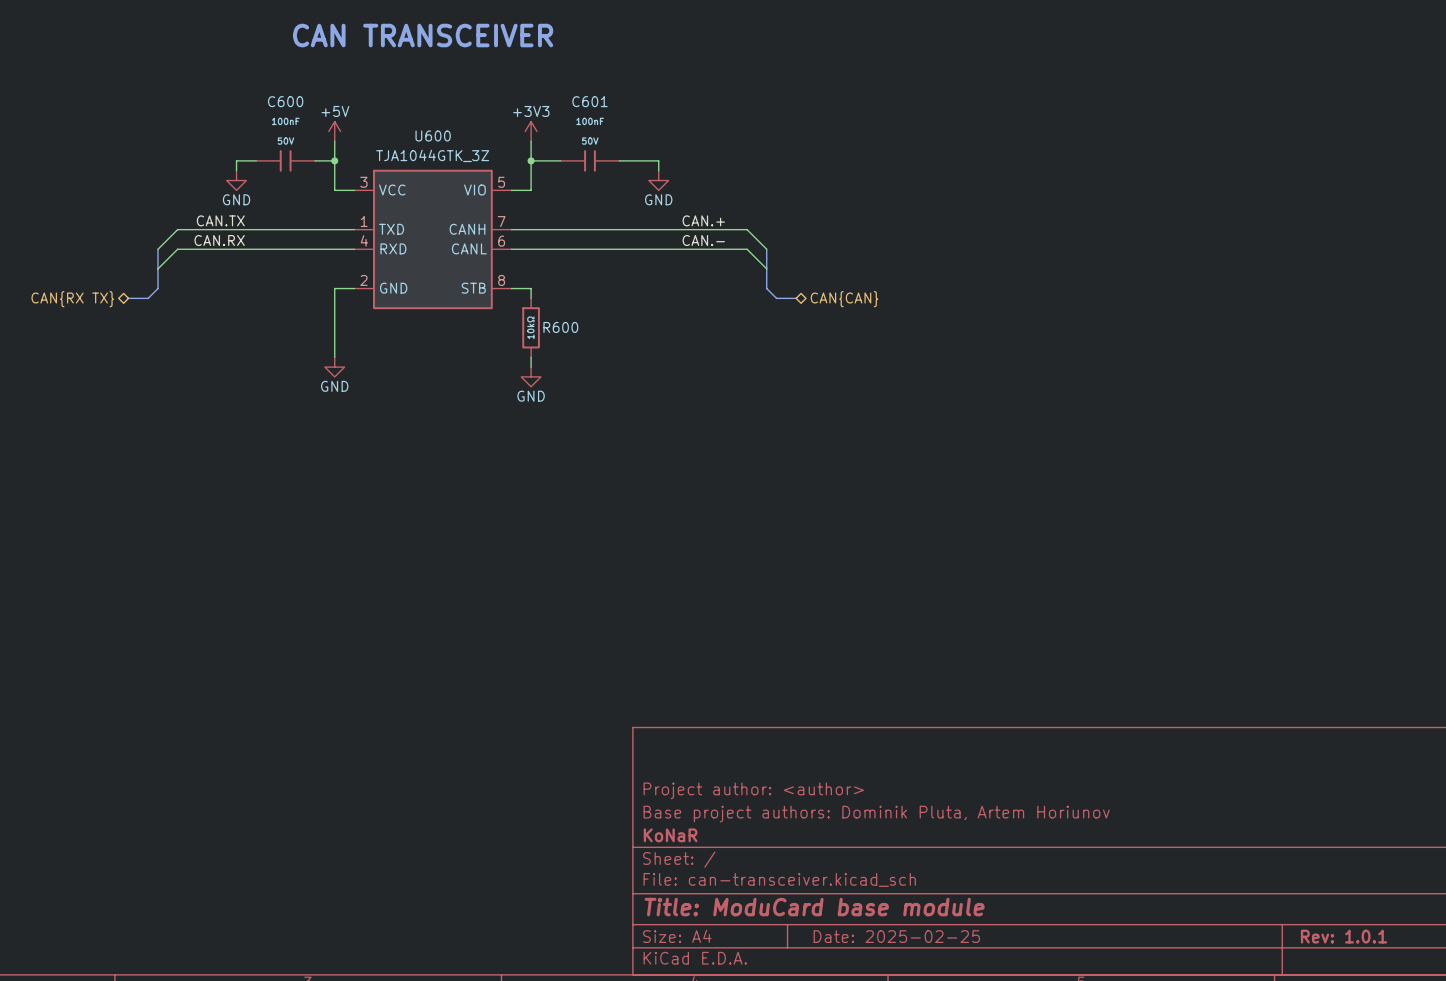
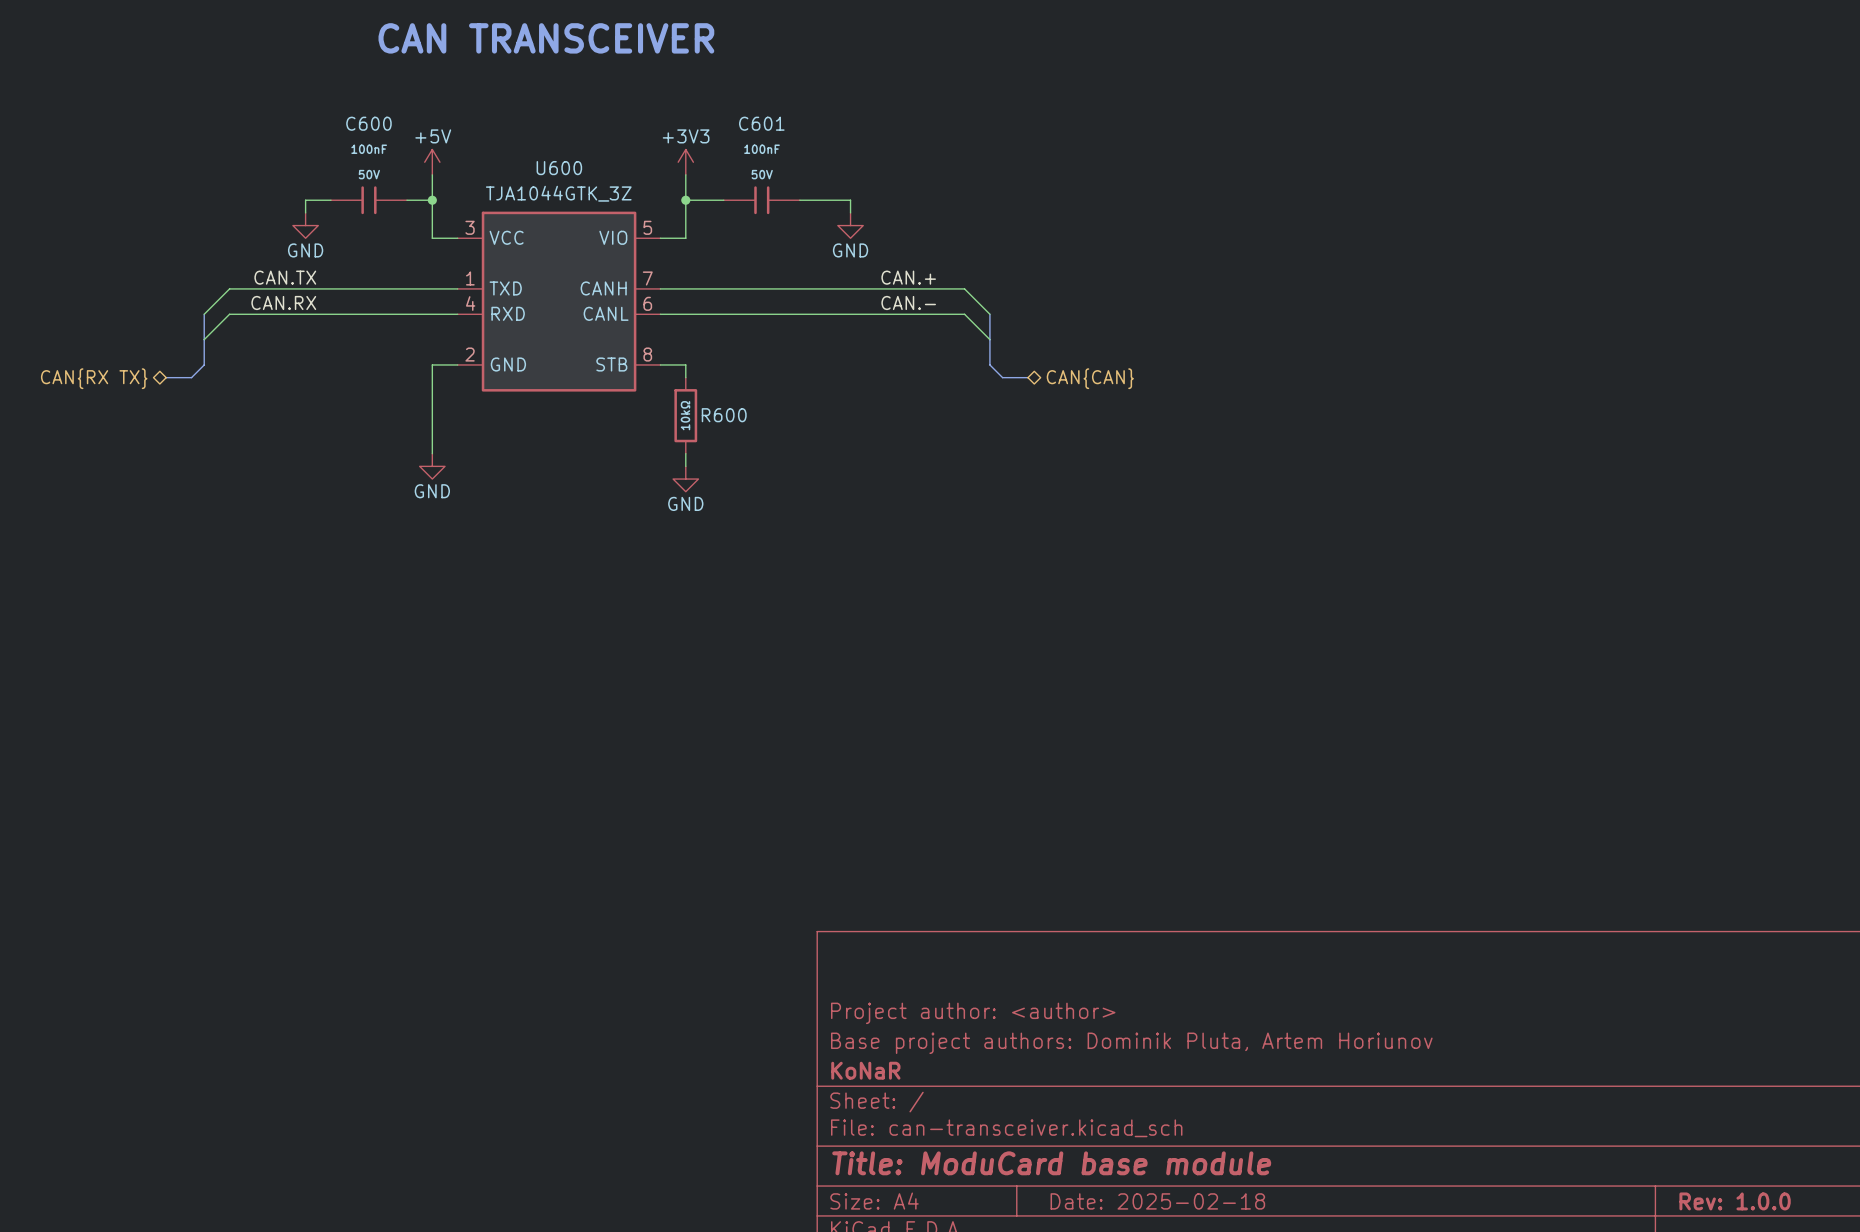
title block: Date: 2025-02-25 (896, 936) -> Date: 2025-02-18 (1157, 1201)
title block: Rev: 1.0.1 (1344, 936) -> Rev: 1.0.0 (1735, 1201)

